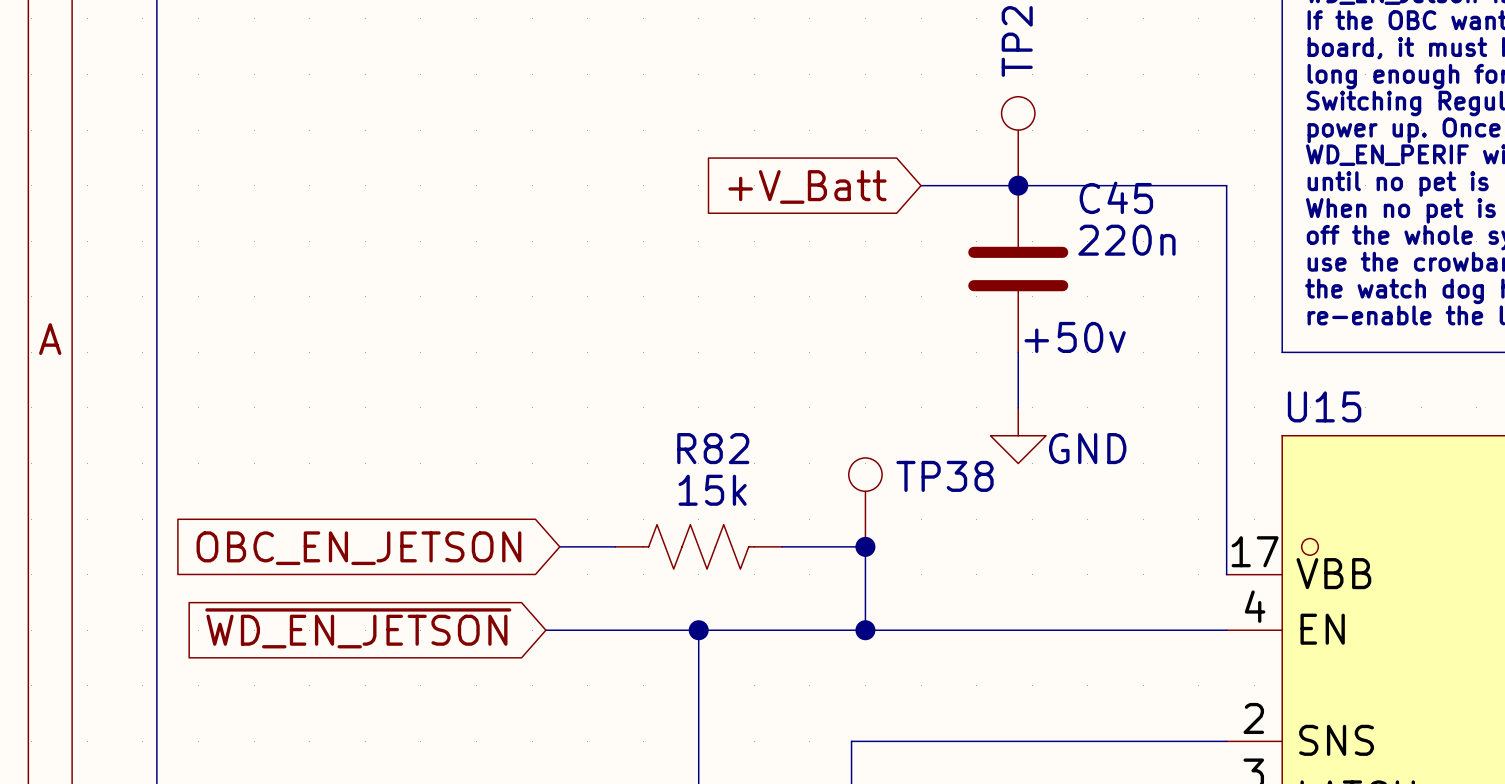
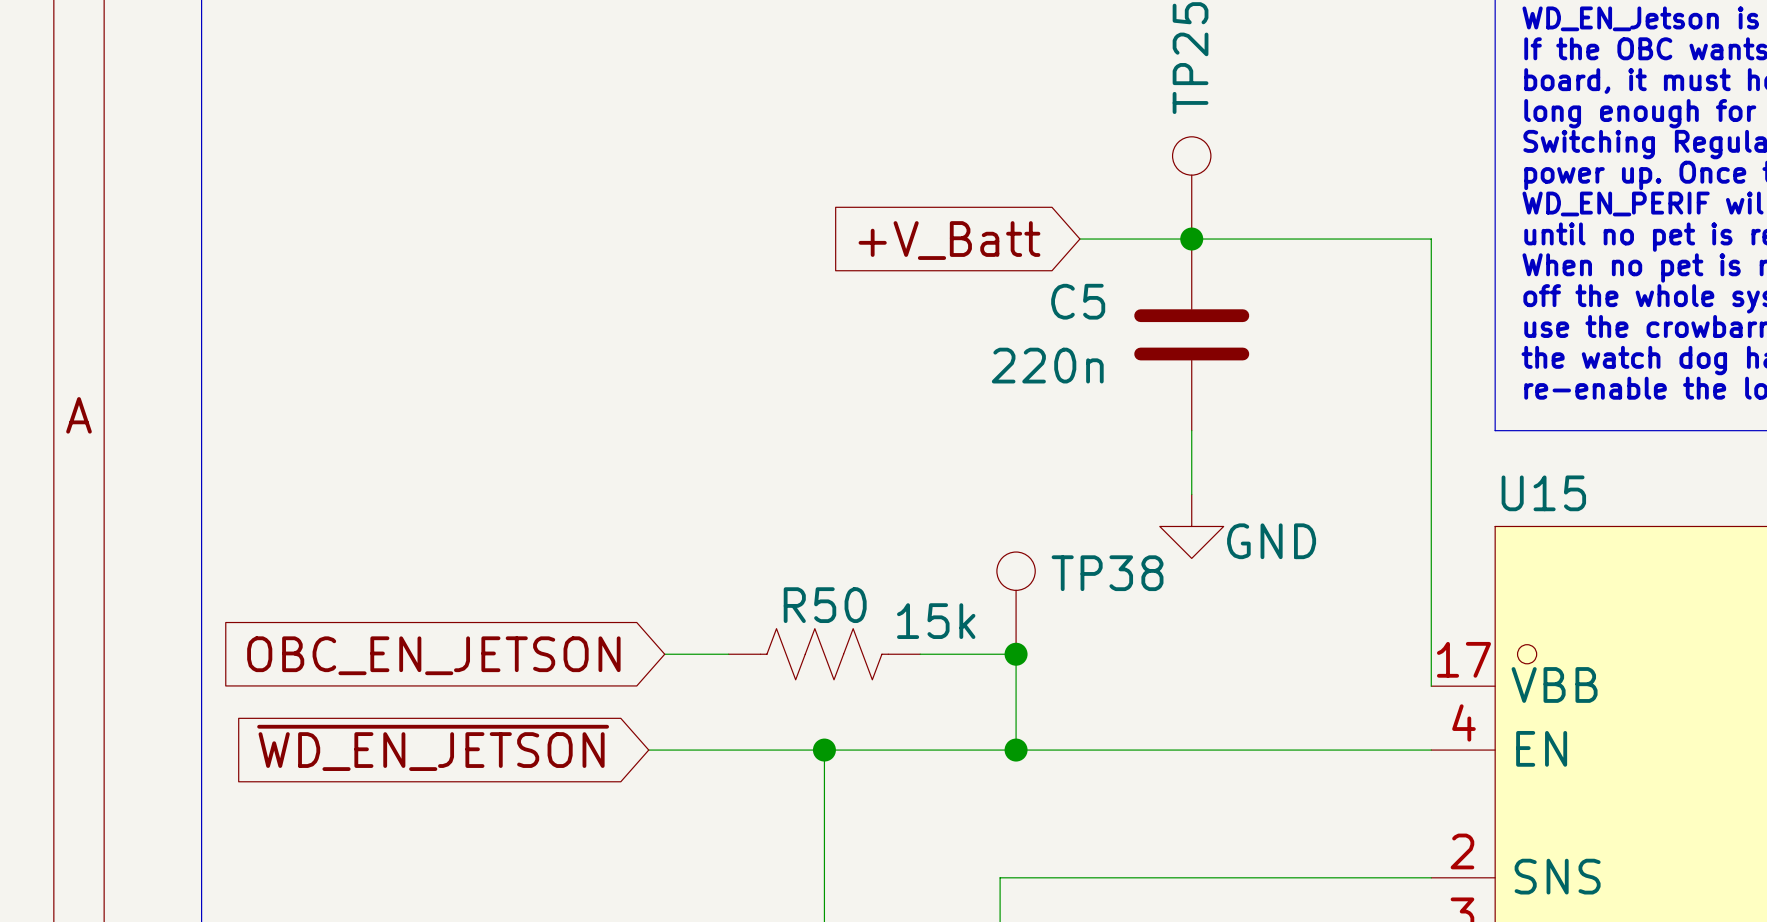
C45 name: C45 (1116, 197) -> C5 (1078, 301)
C45 value position: 220n (1126, 240) -> 220n (1047, 365)
C45 text: +50v (1075, 337) -> none
R82 name: R82 (713, 448) -> R50 (825, 605)
R82 value position: 15k (712, 490) -> 15k (936, 621)

